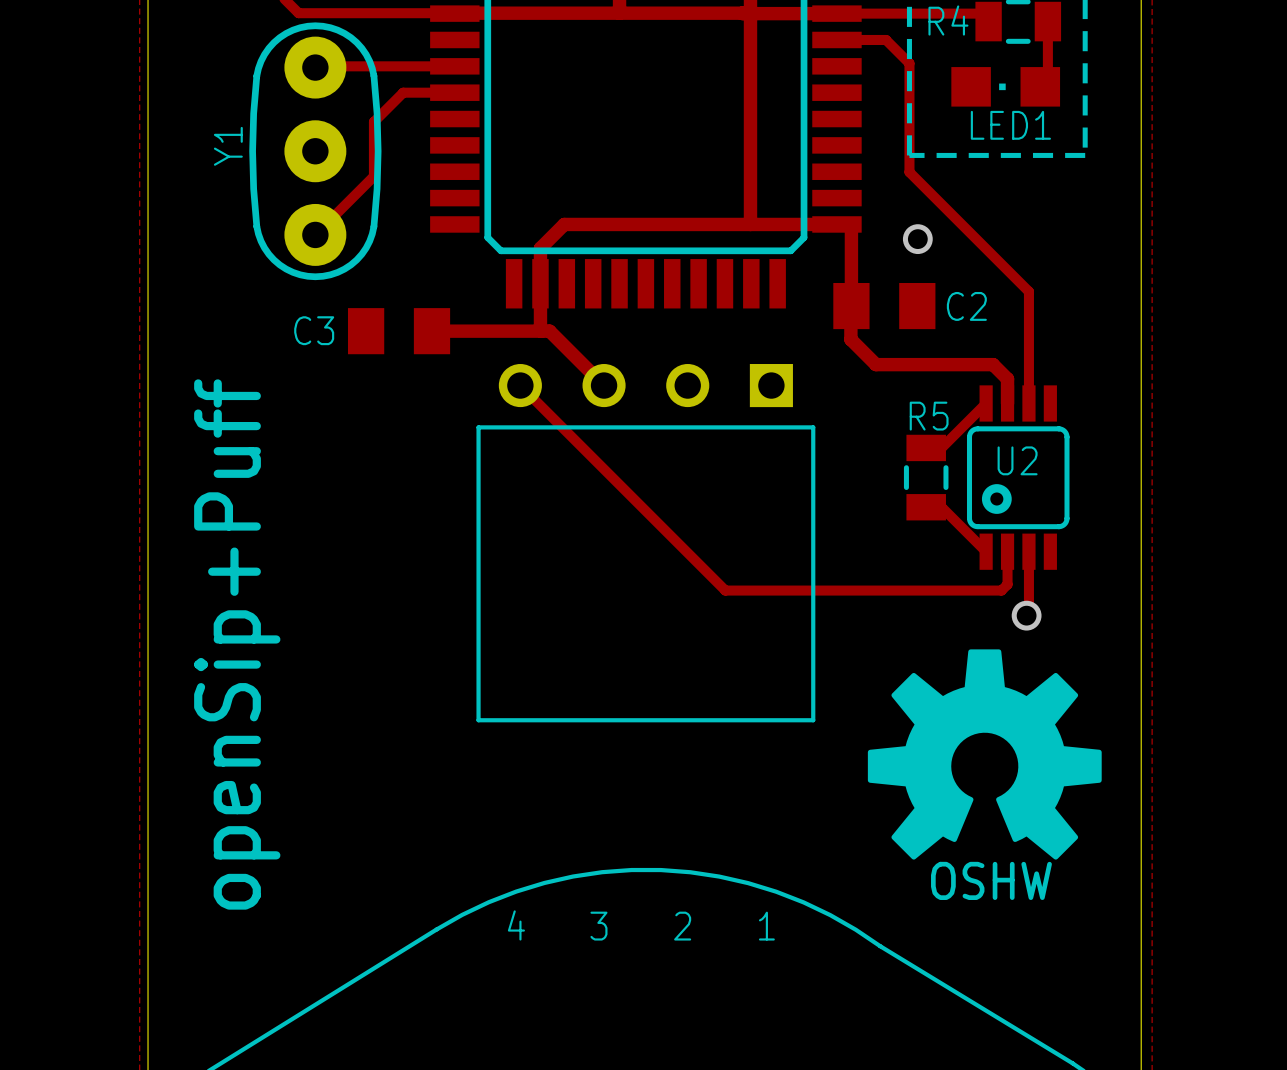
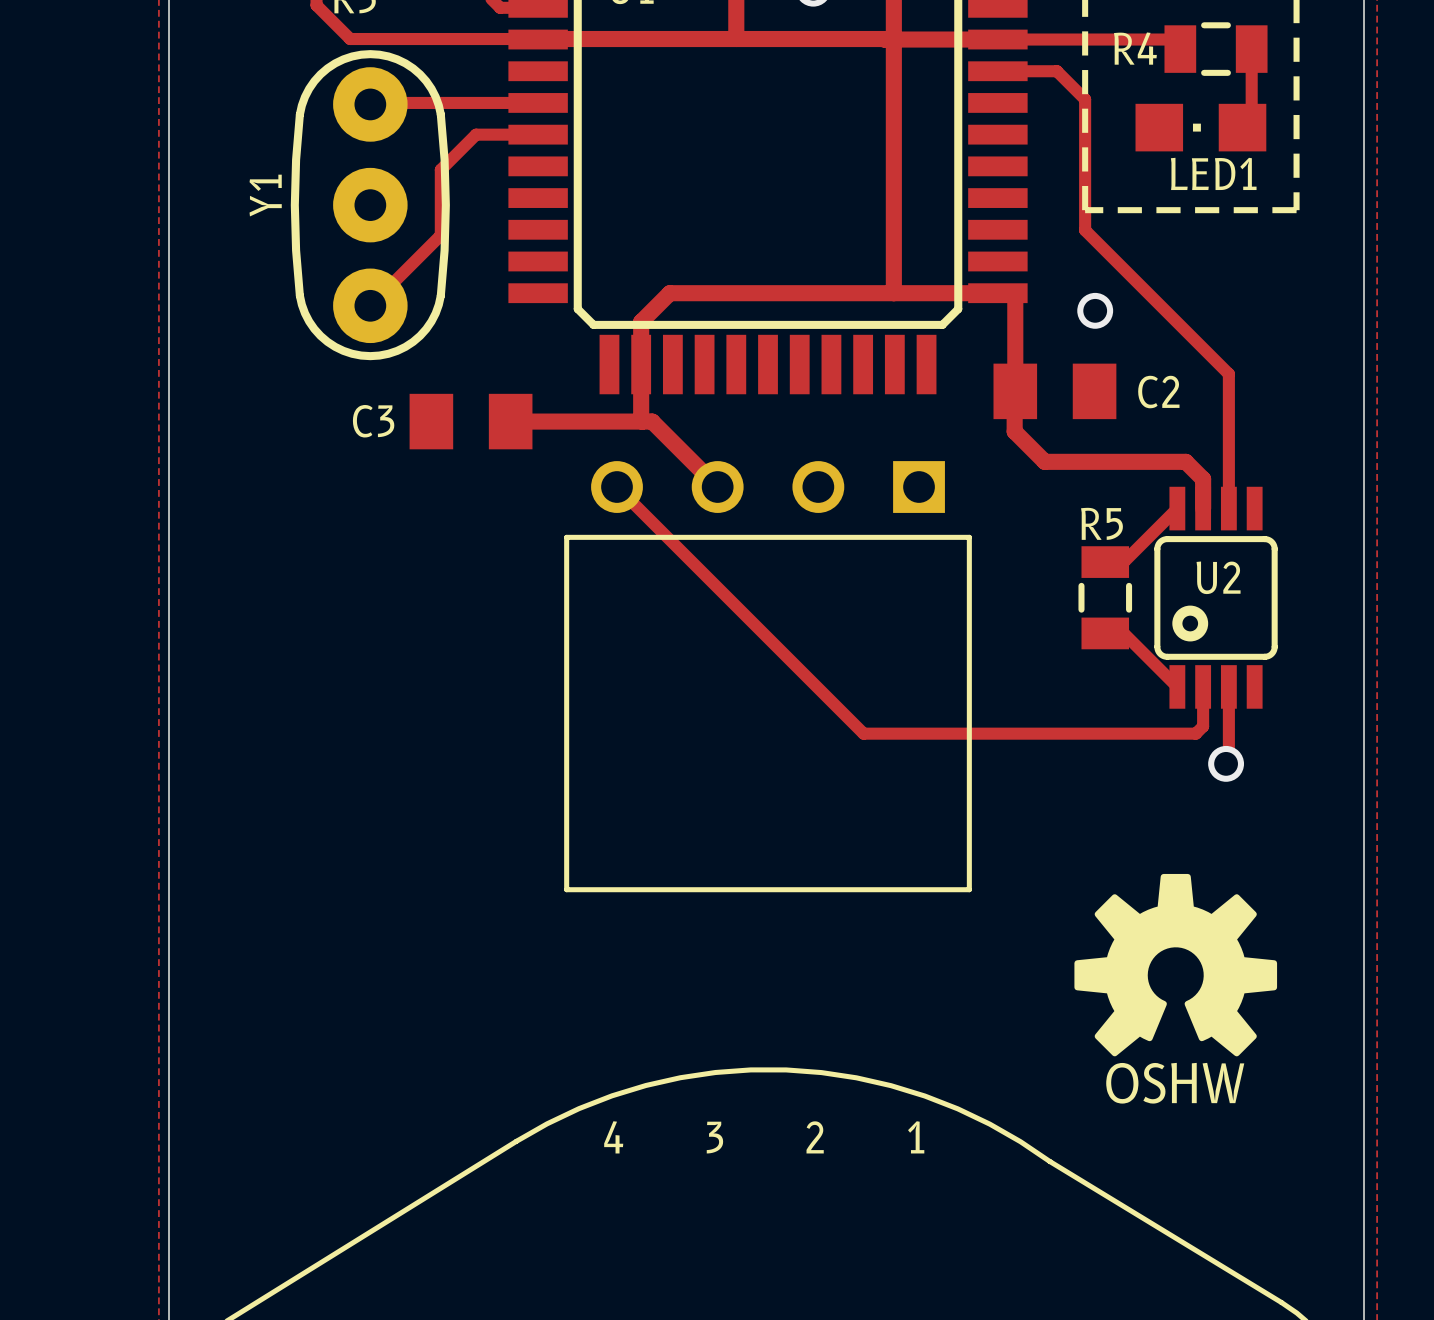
text: openSip+Puff (237, 644) -> none
drawing shape: [867, 649, 1102, 860] -> [1074, 873, 1278, 1057]

